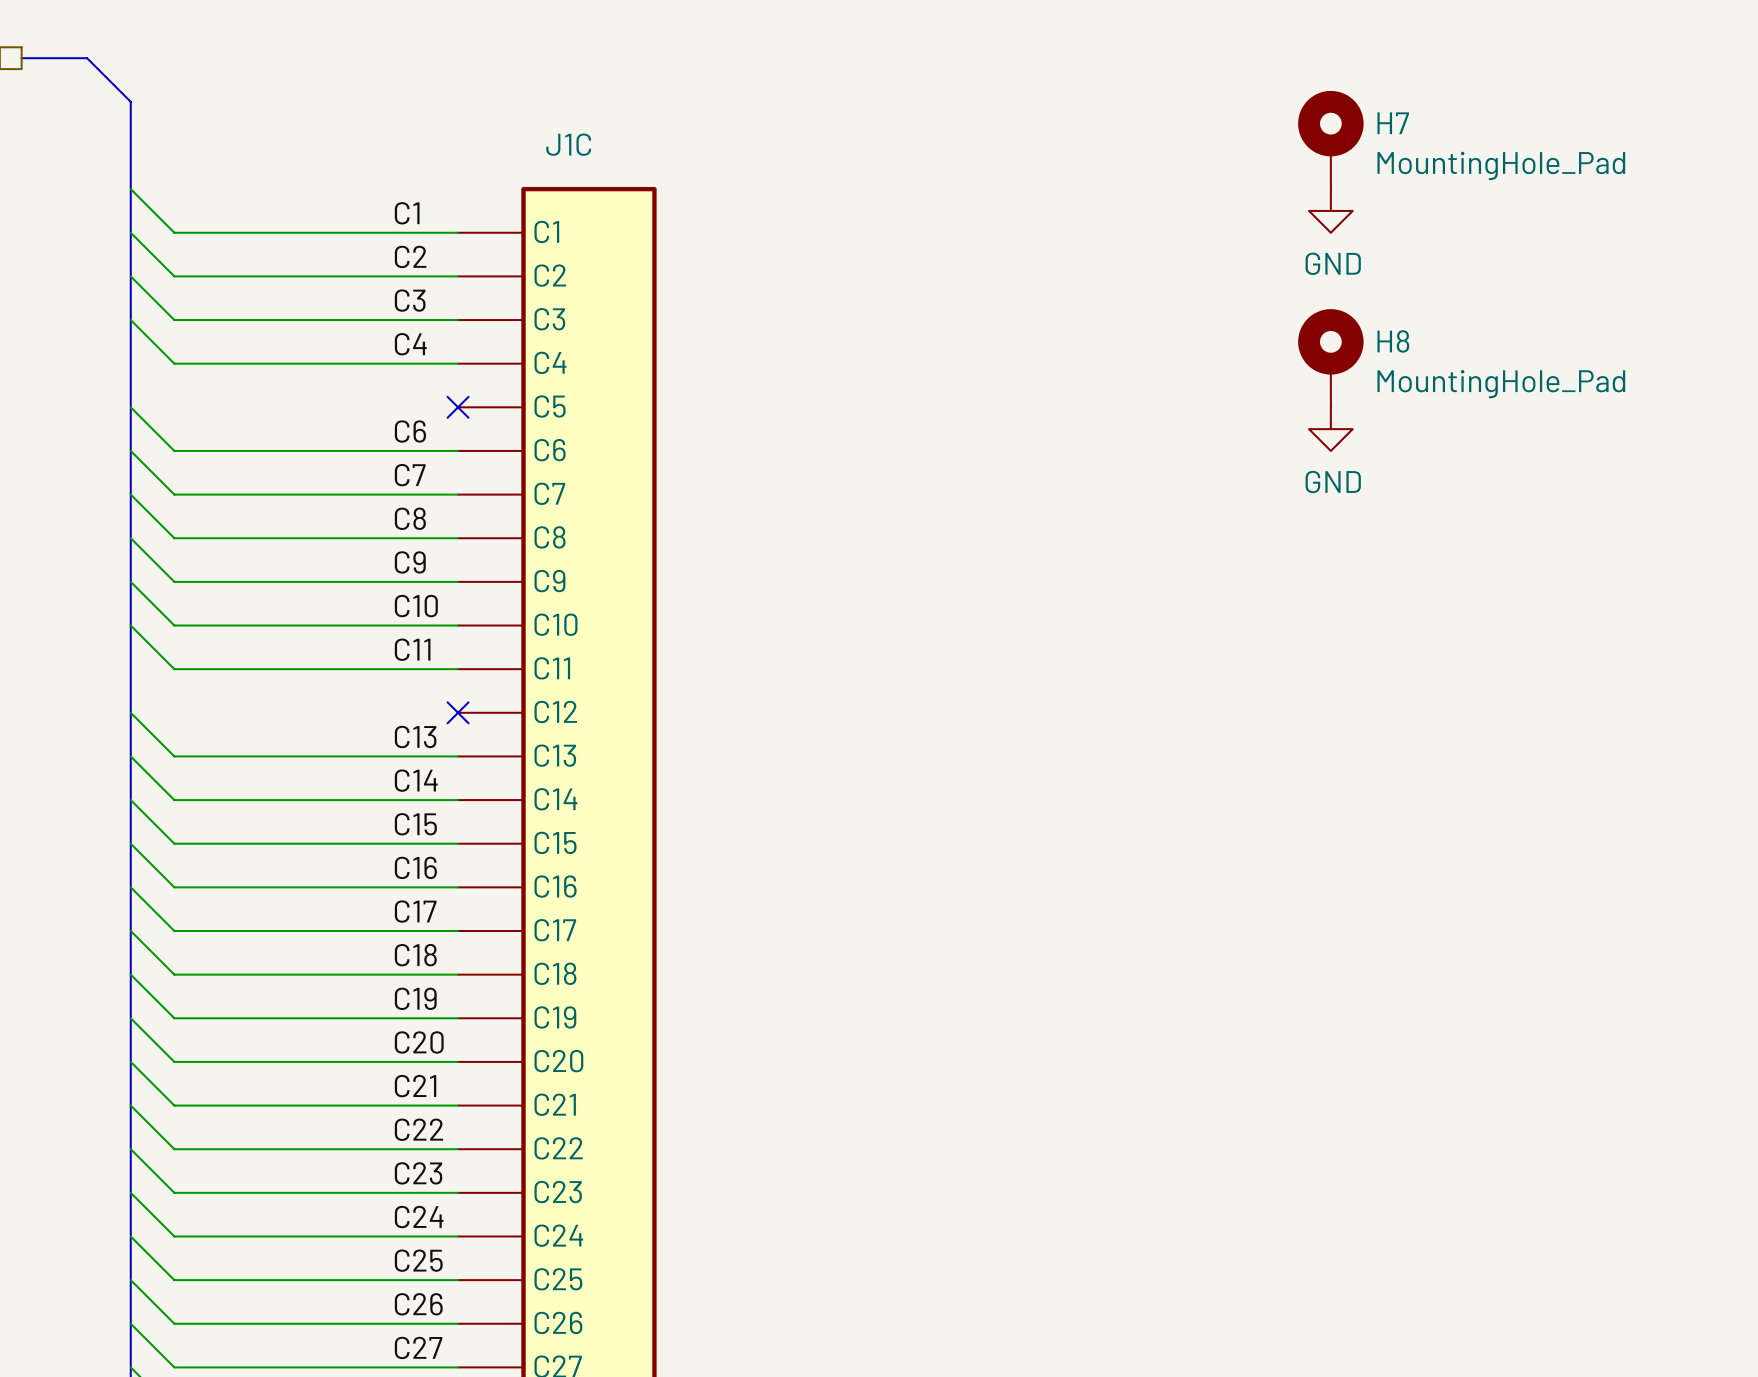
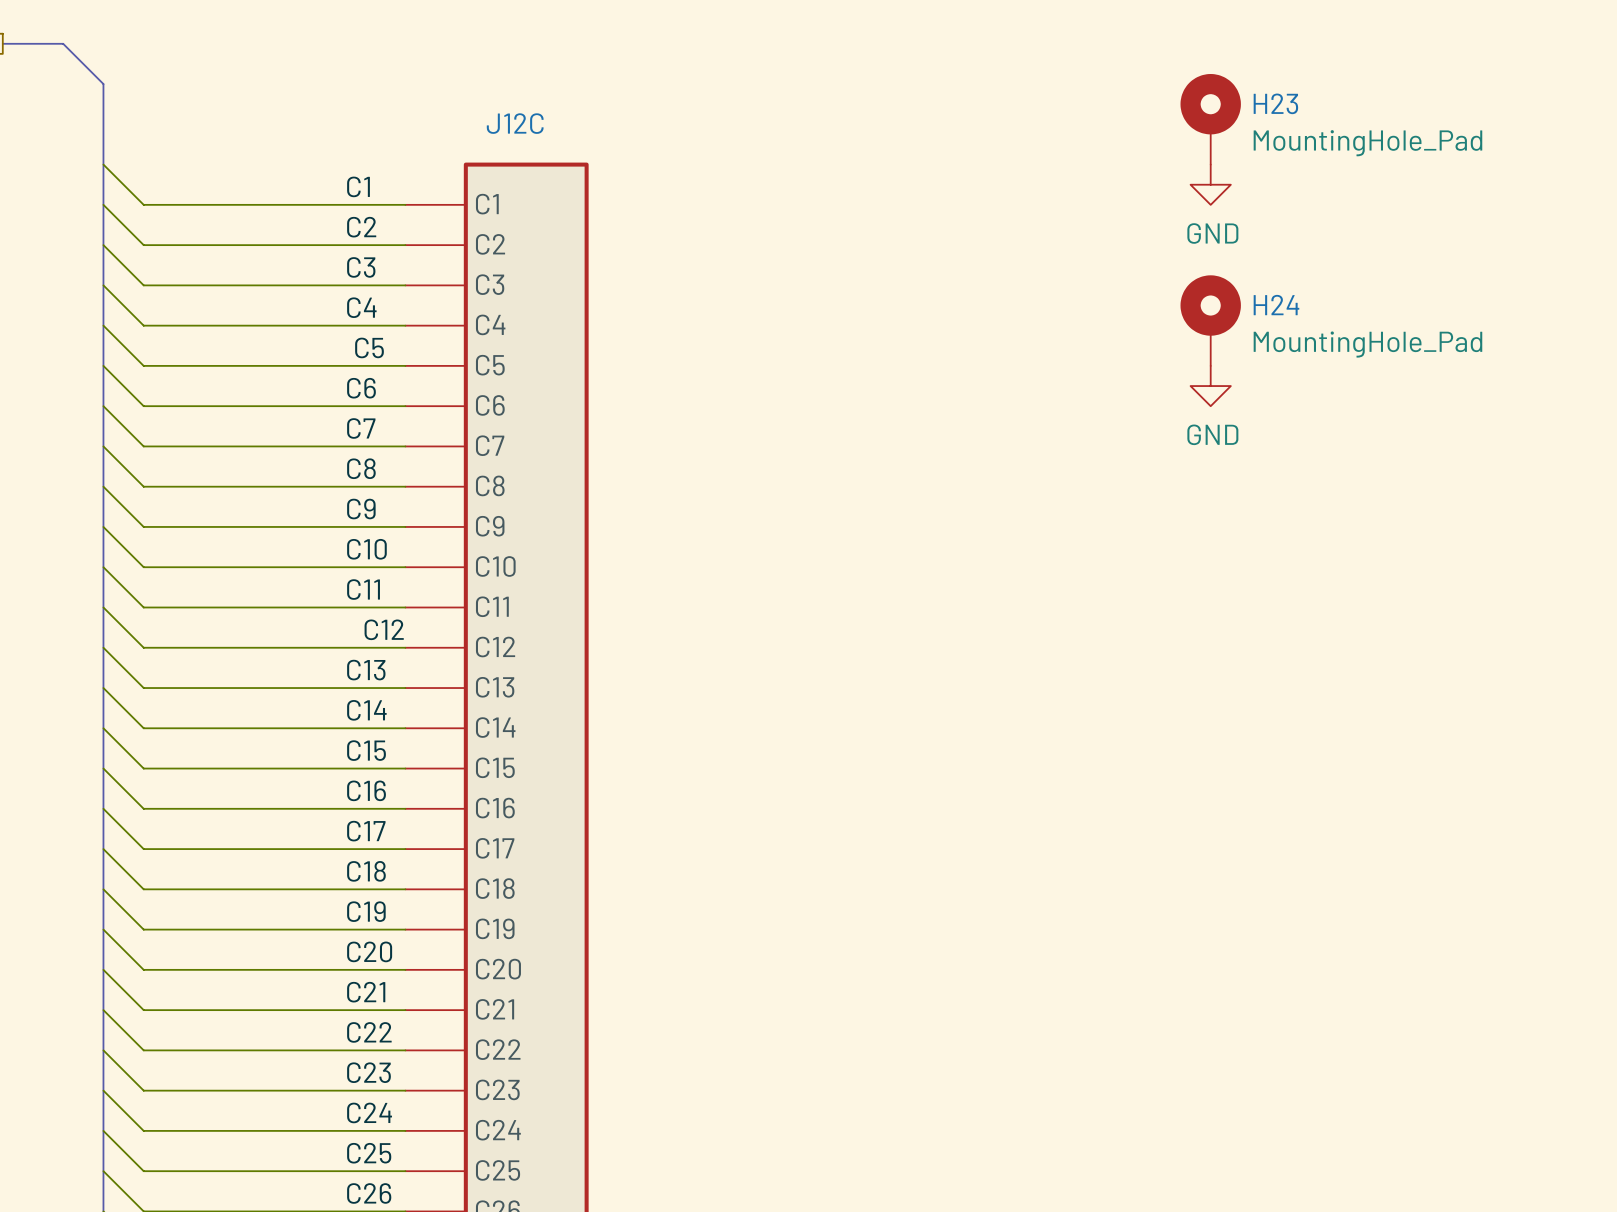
H7 name: H7 (1393, 123) -> H23 (1275, 103)
J1C name: J1C (568, 144) -> J12C (515, 123)
H8 name: H8 (1393, 341) -> H24 (1276, 305)
wire: none -> (103, 325) (143, 365) (405, 365)
label: none -> C5 (369, 347)
no-connect mark: (458, 407) -> none
wire: none -> (103, 607) (143, 647) (405, 647)
label: none -> C12 (384, 629)
no-connect mark: (458, 712) -> none

